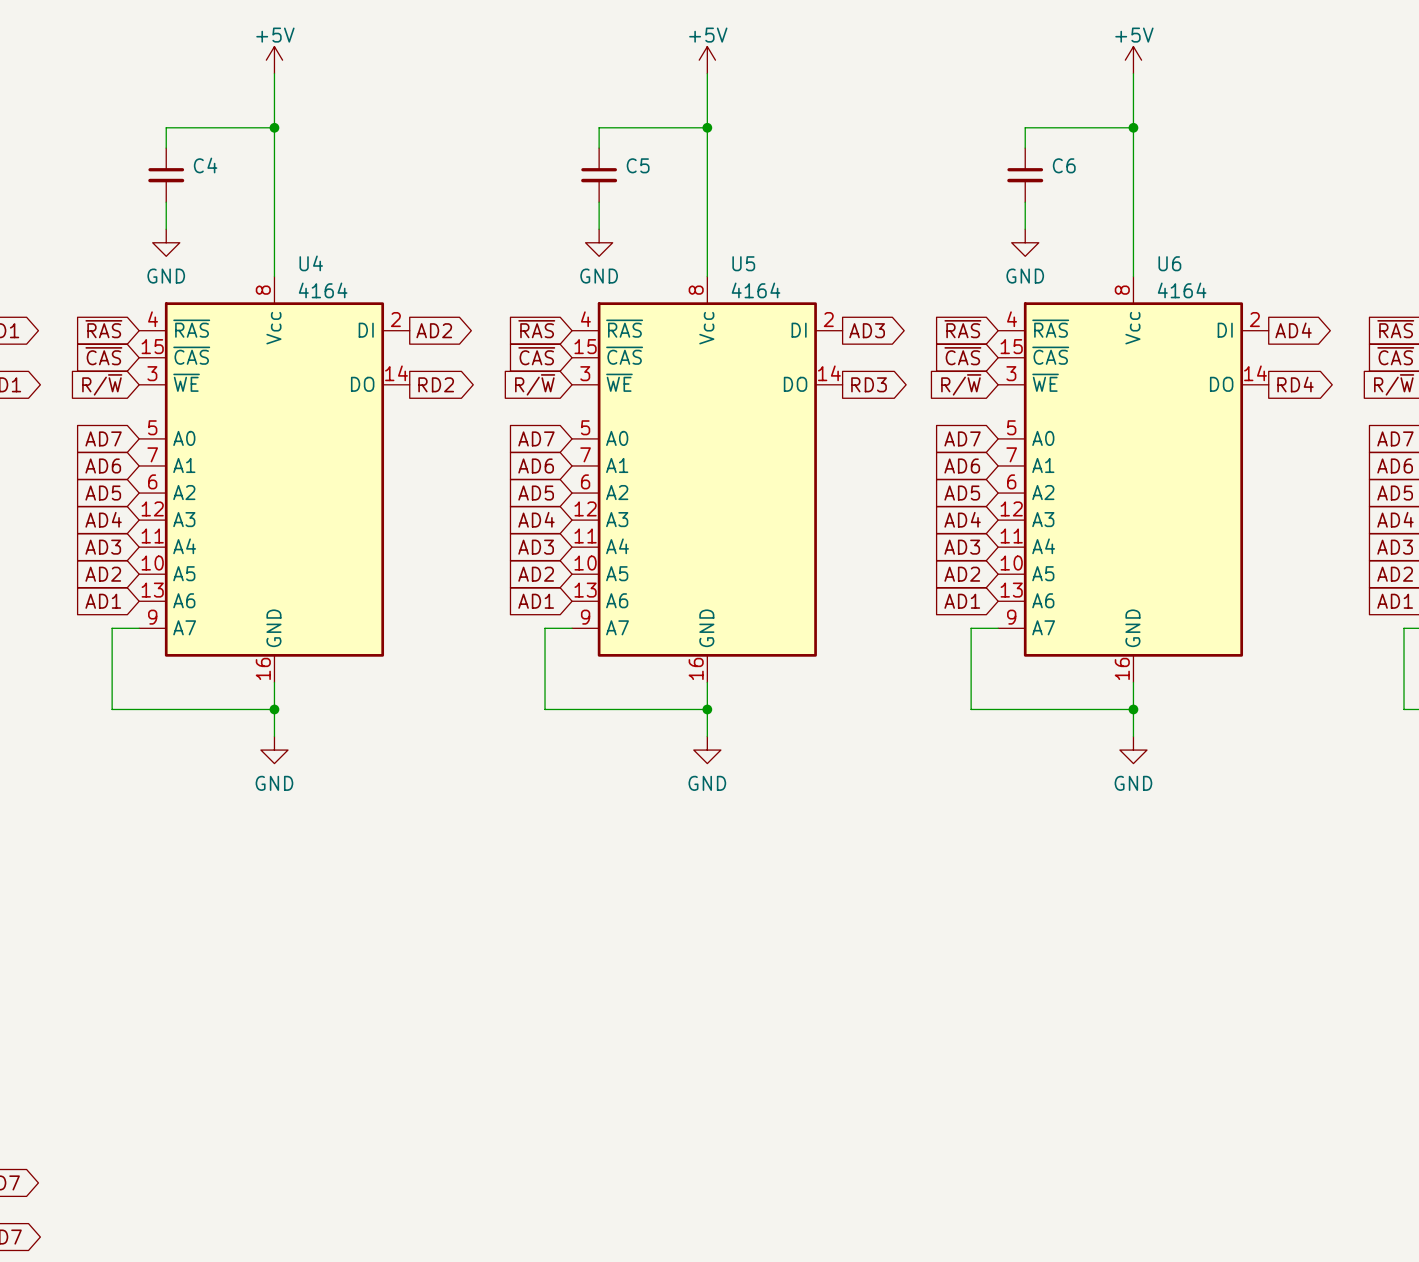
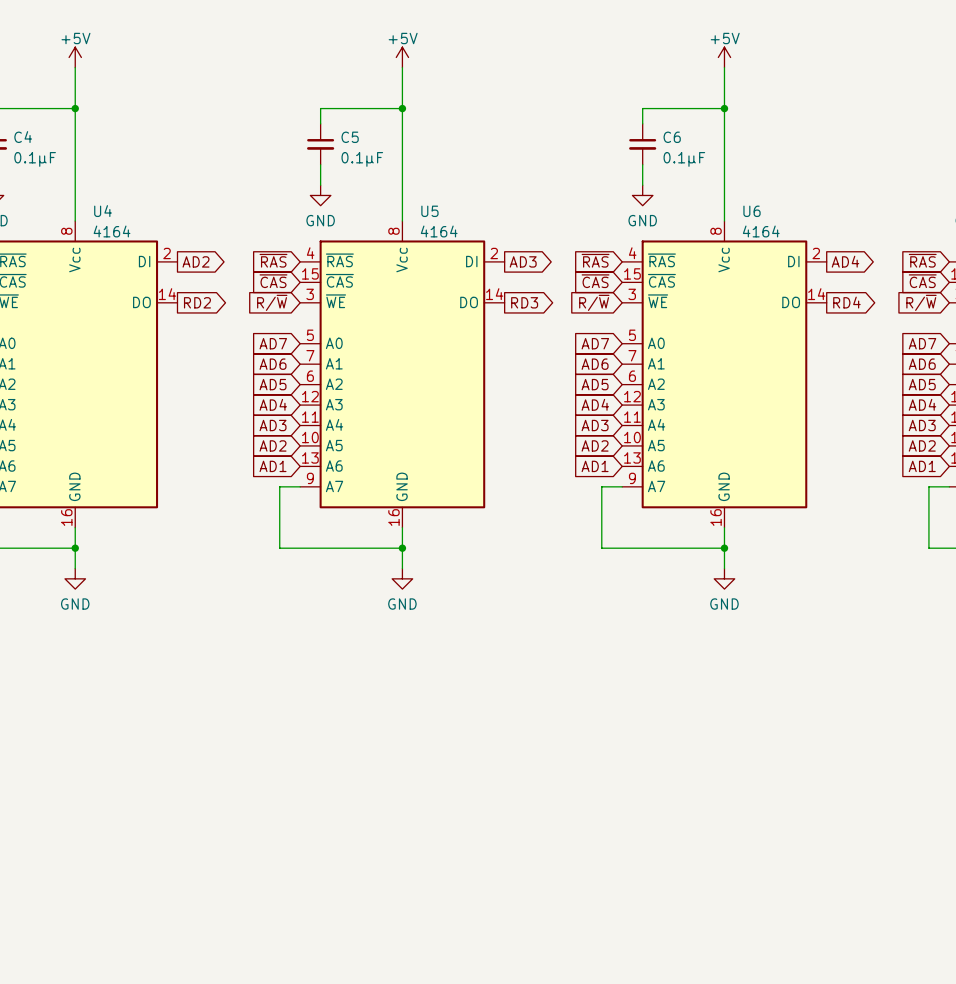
C4 value: none -> 0.1µF (35, 159)
C5 value: none -> 0.1µF (362, 159)
C6 value: none -> 0.1µF (684, 159)

